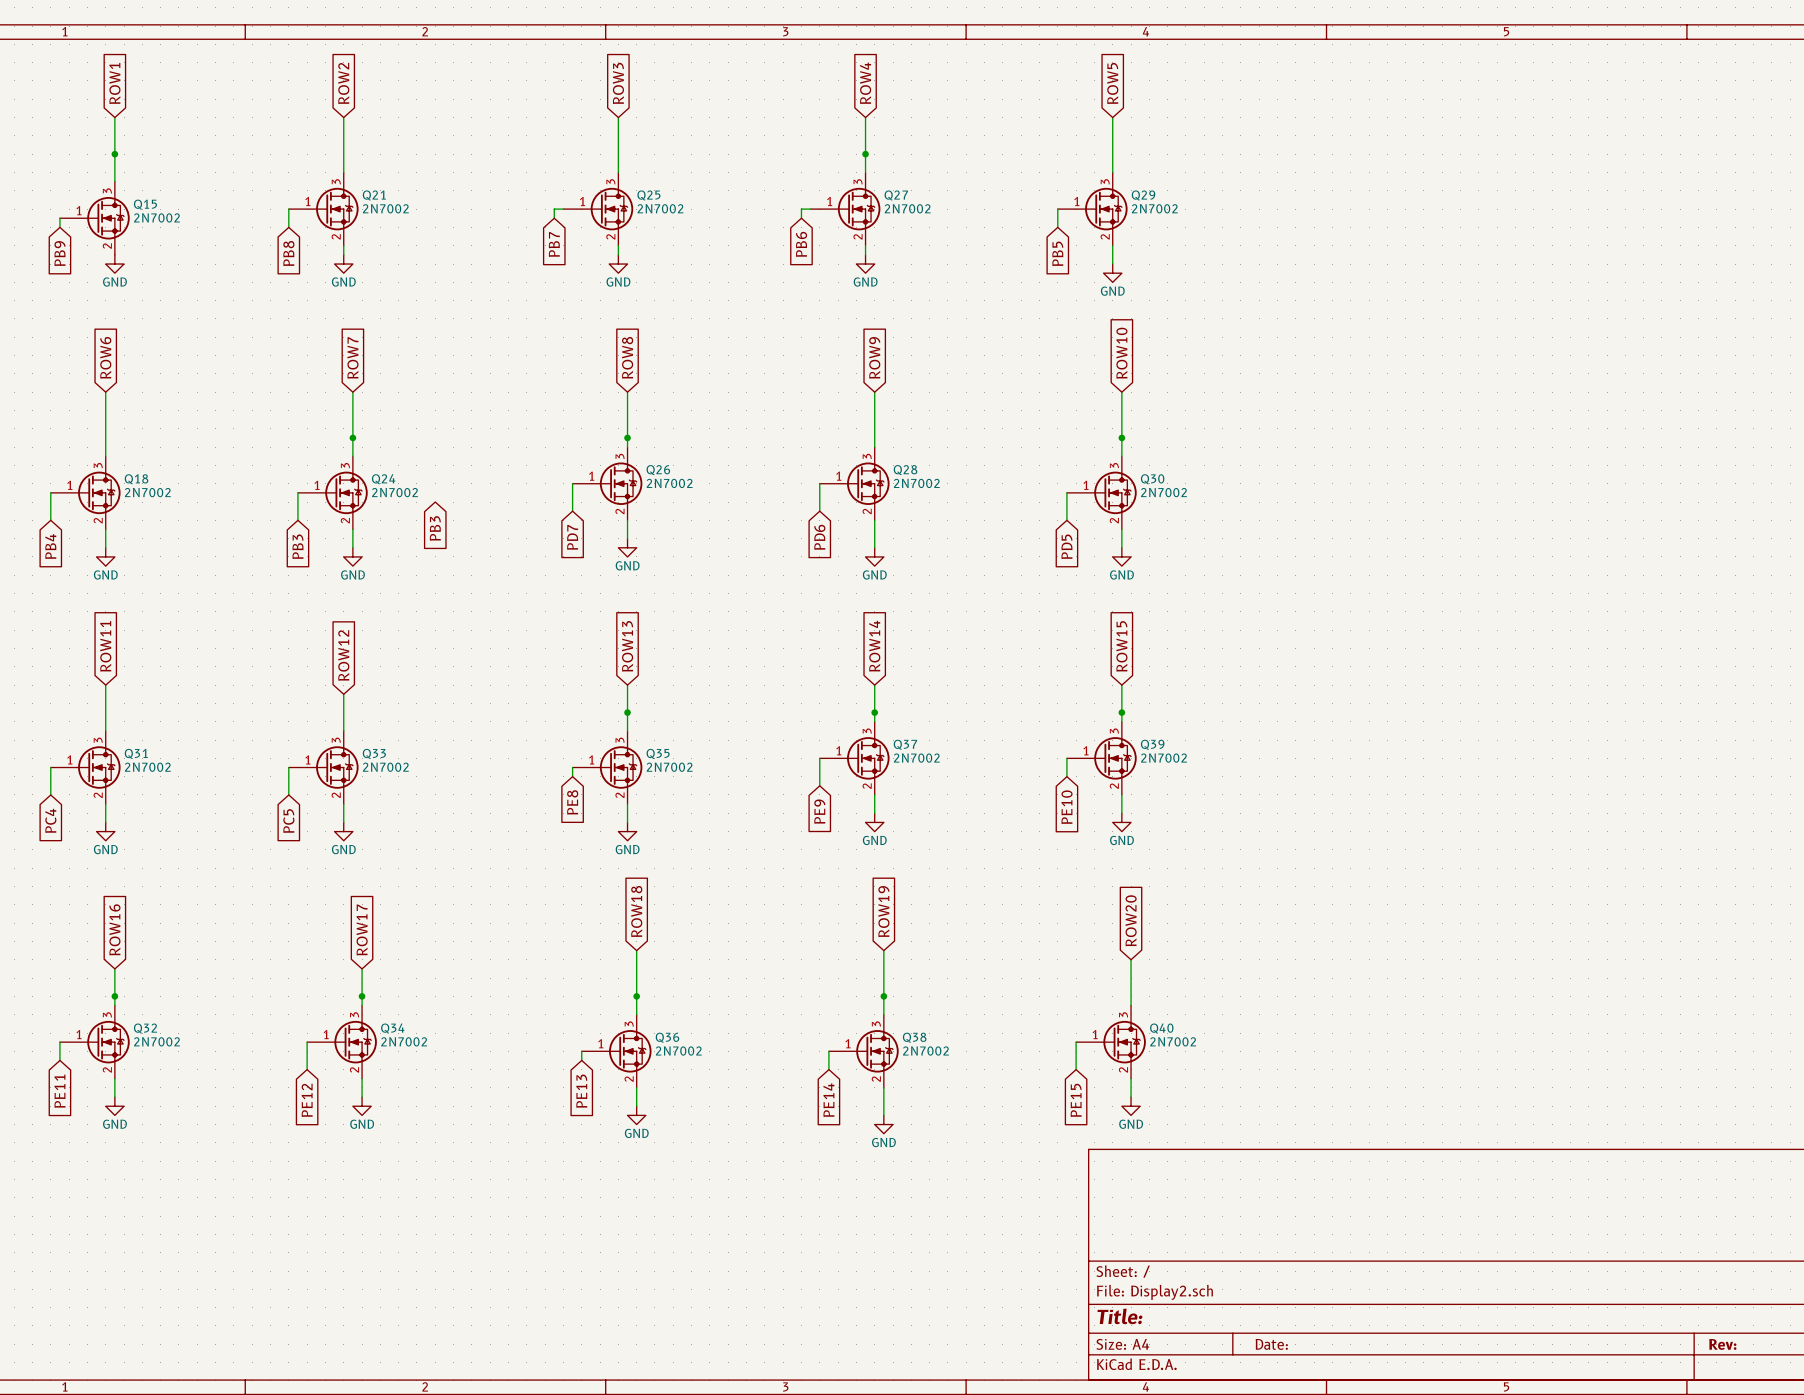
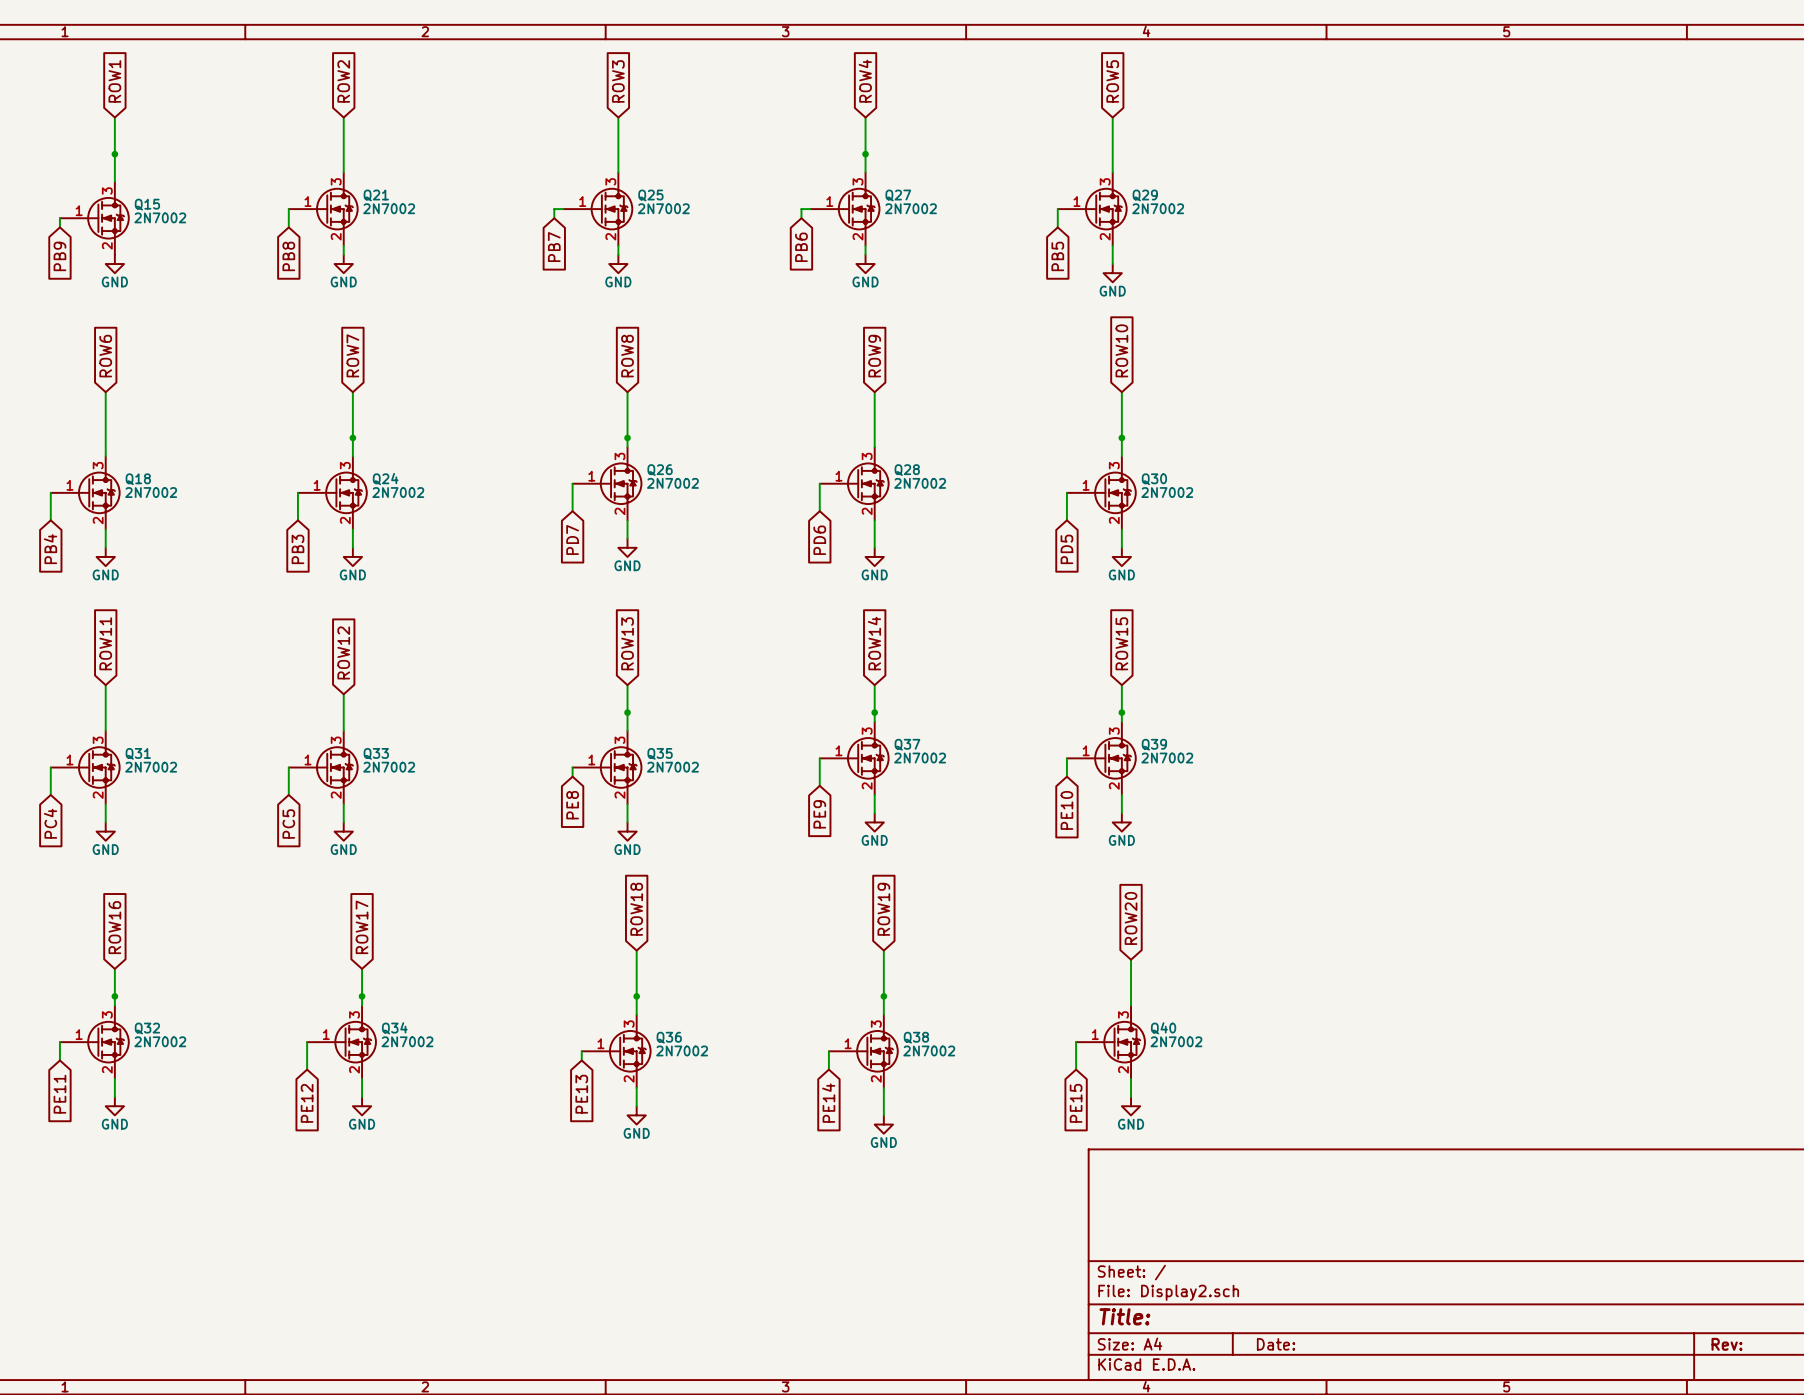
global label: PB3 (435, 528) -> none

